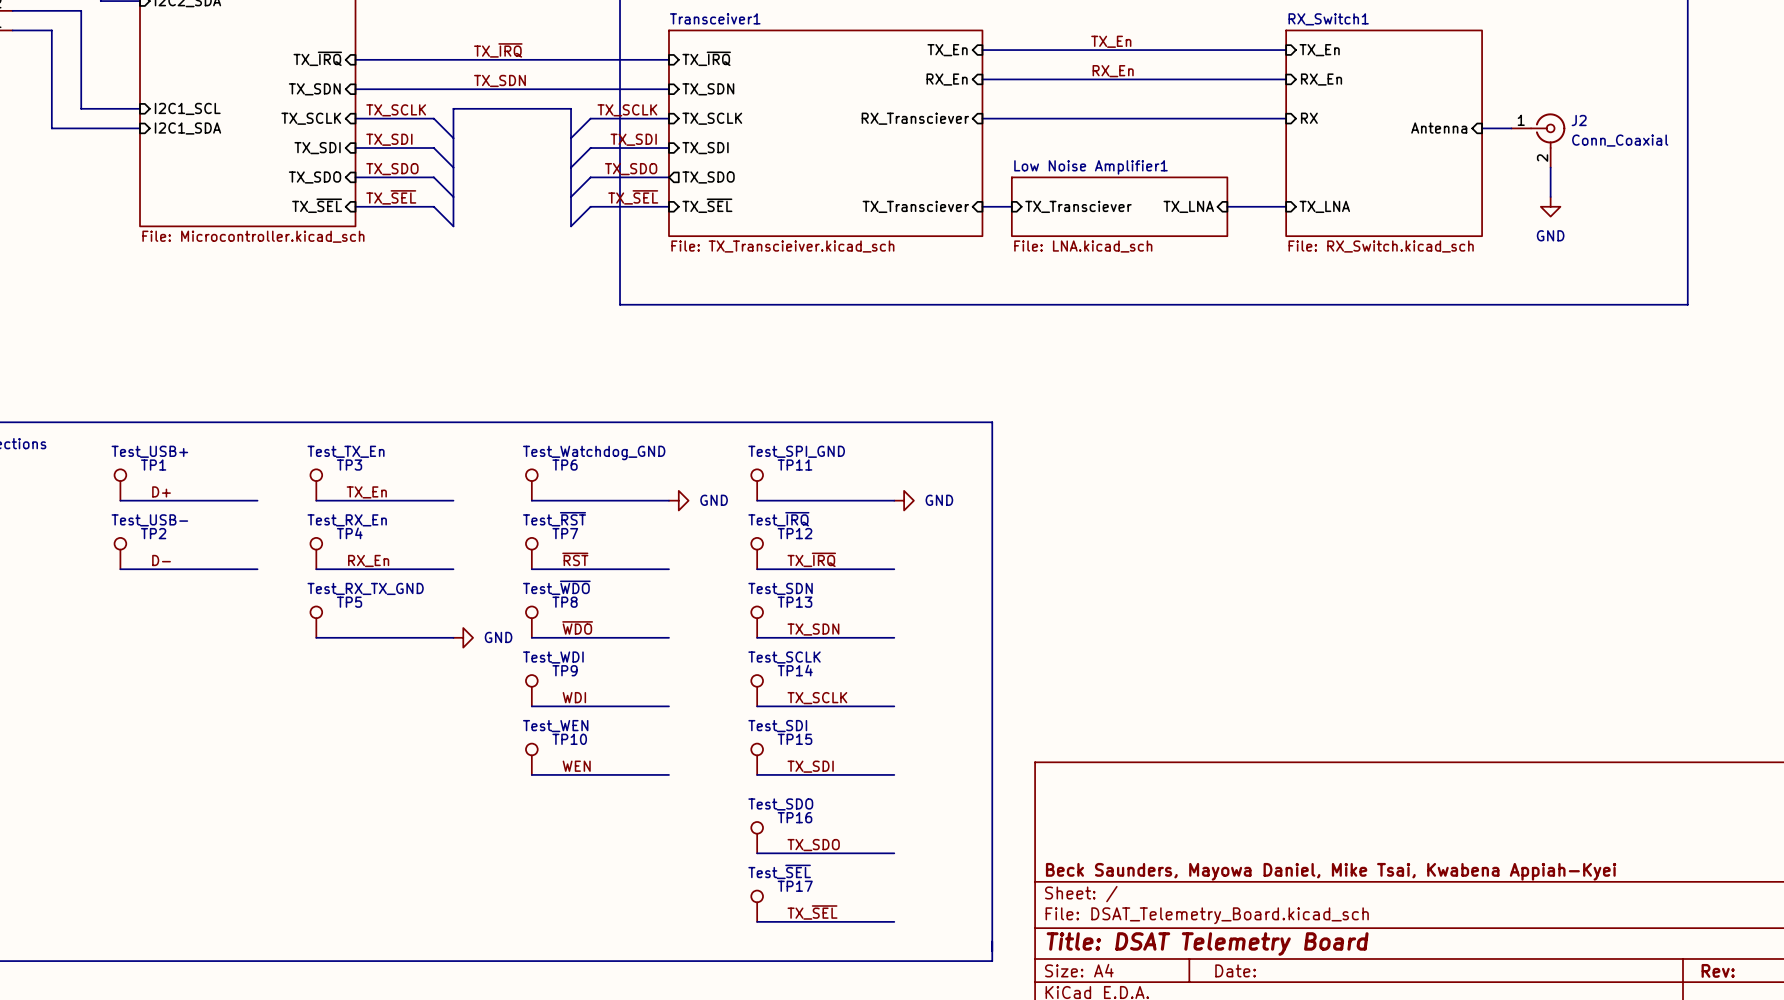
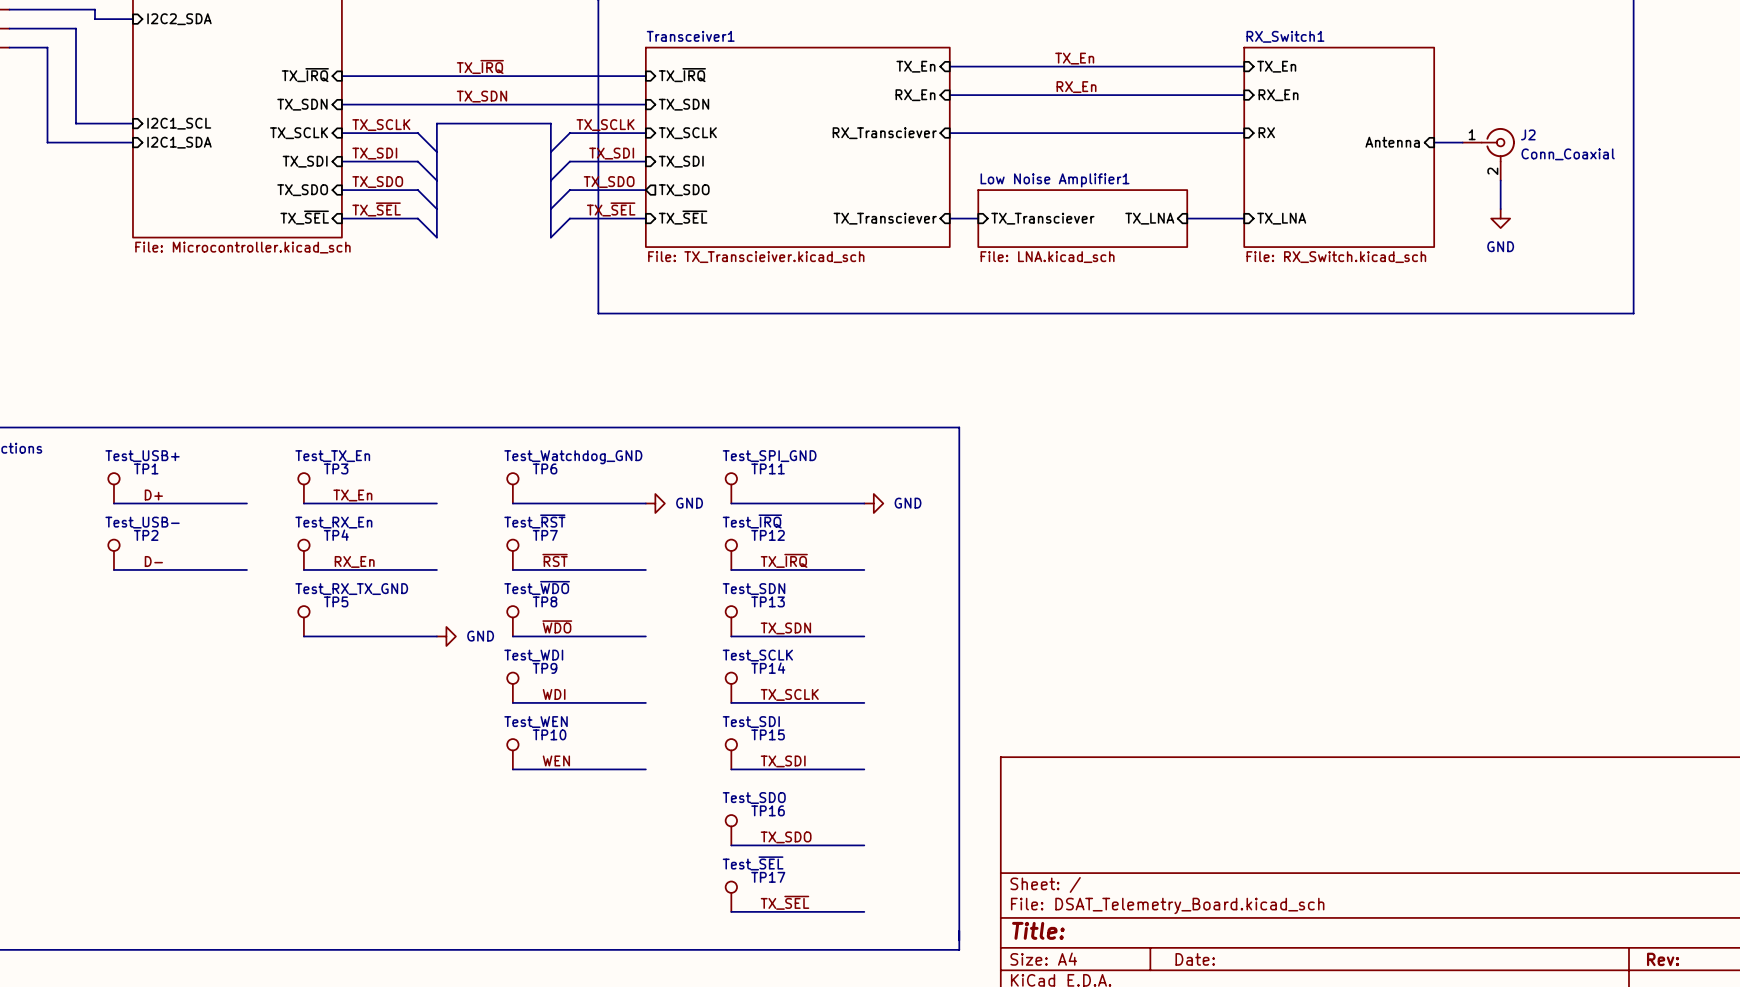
title block: Beck Saunders, Mayowa Daniel, Mike Tsai, Kwabena Appiah-Kyei (1331, 871) -> none
title block: Title: DSAT Telemetry Board (1207, 944) -> Title: (1038, 930)

